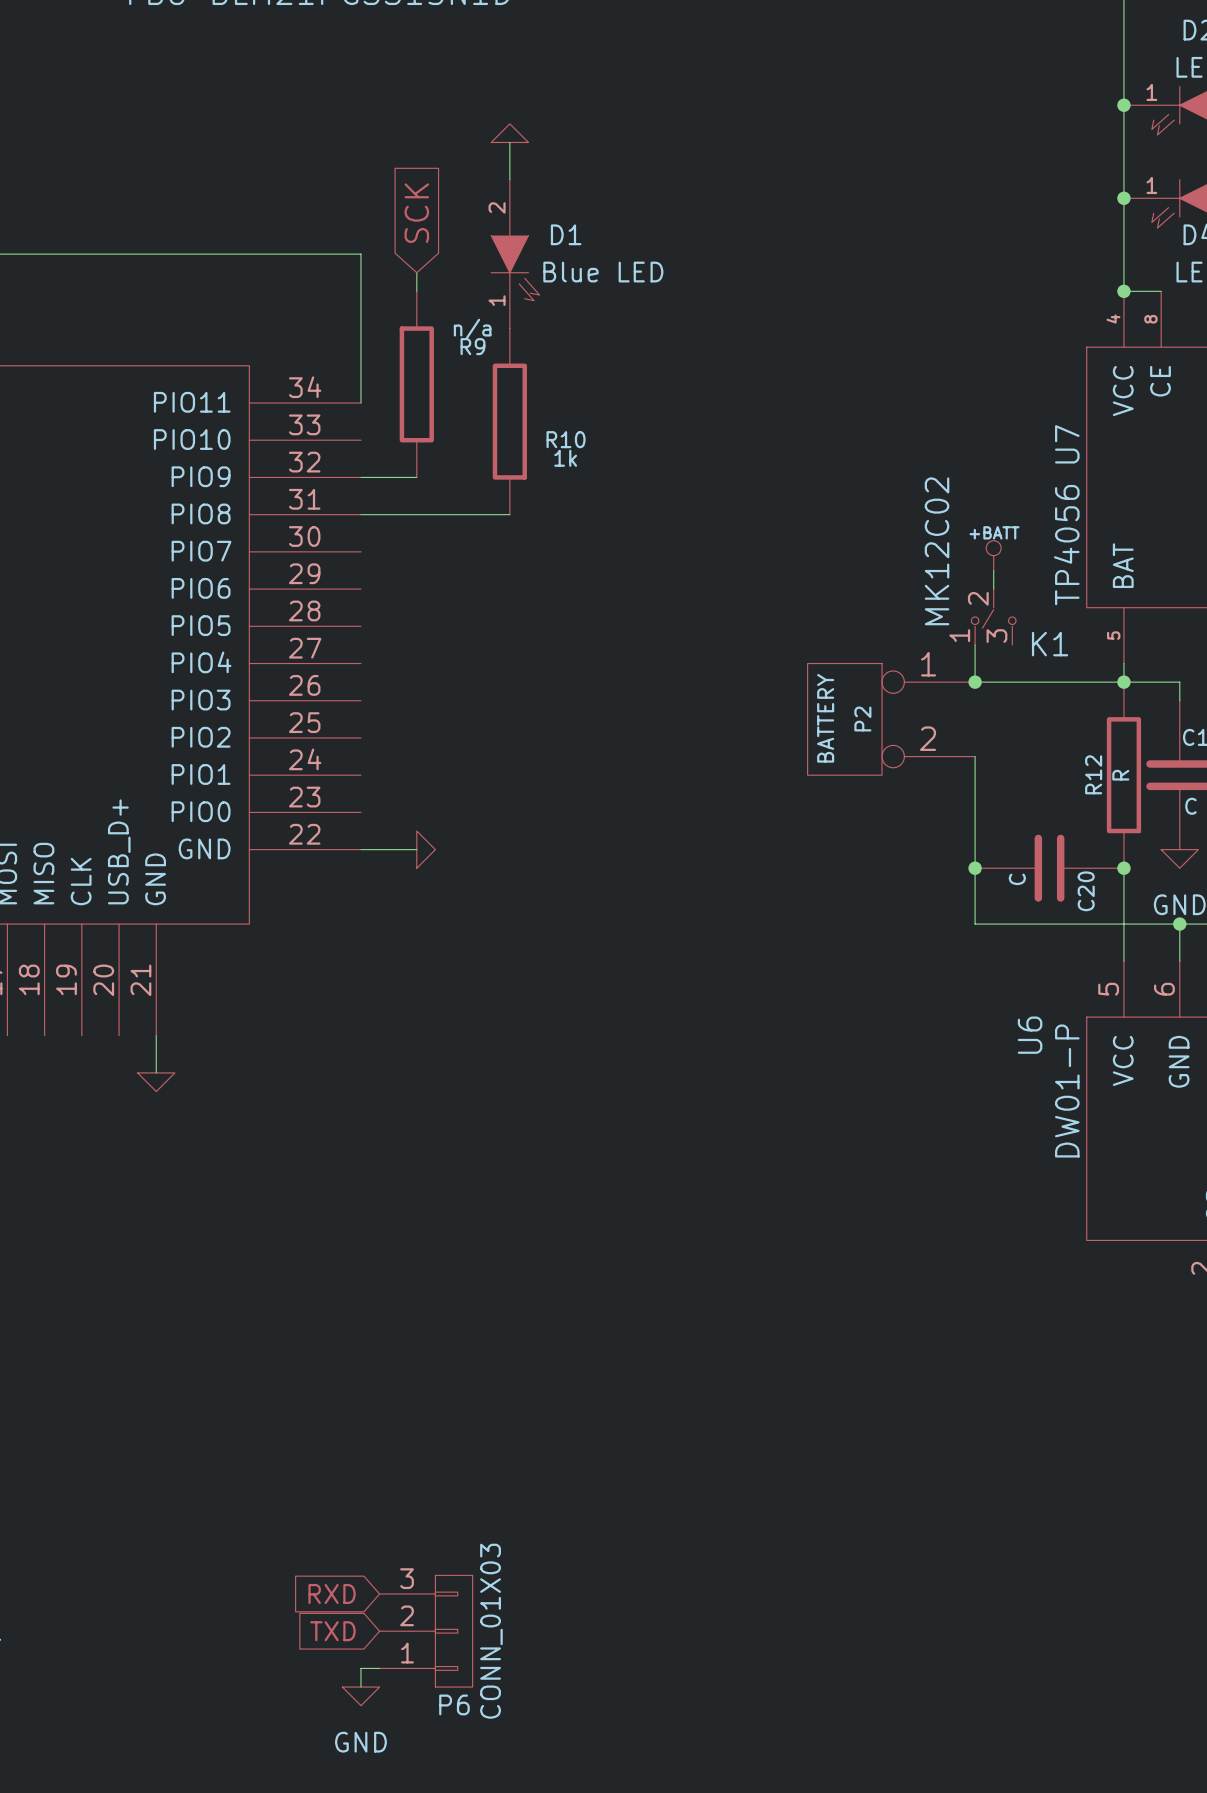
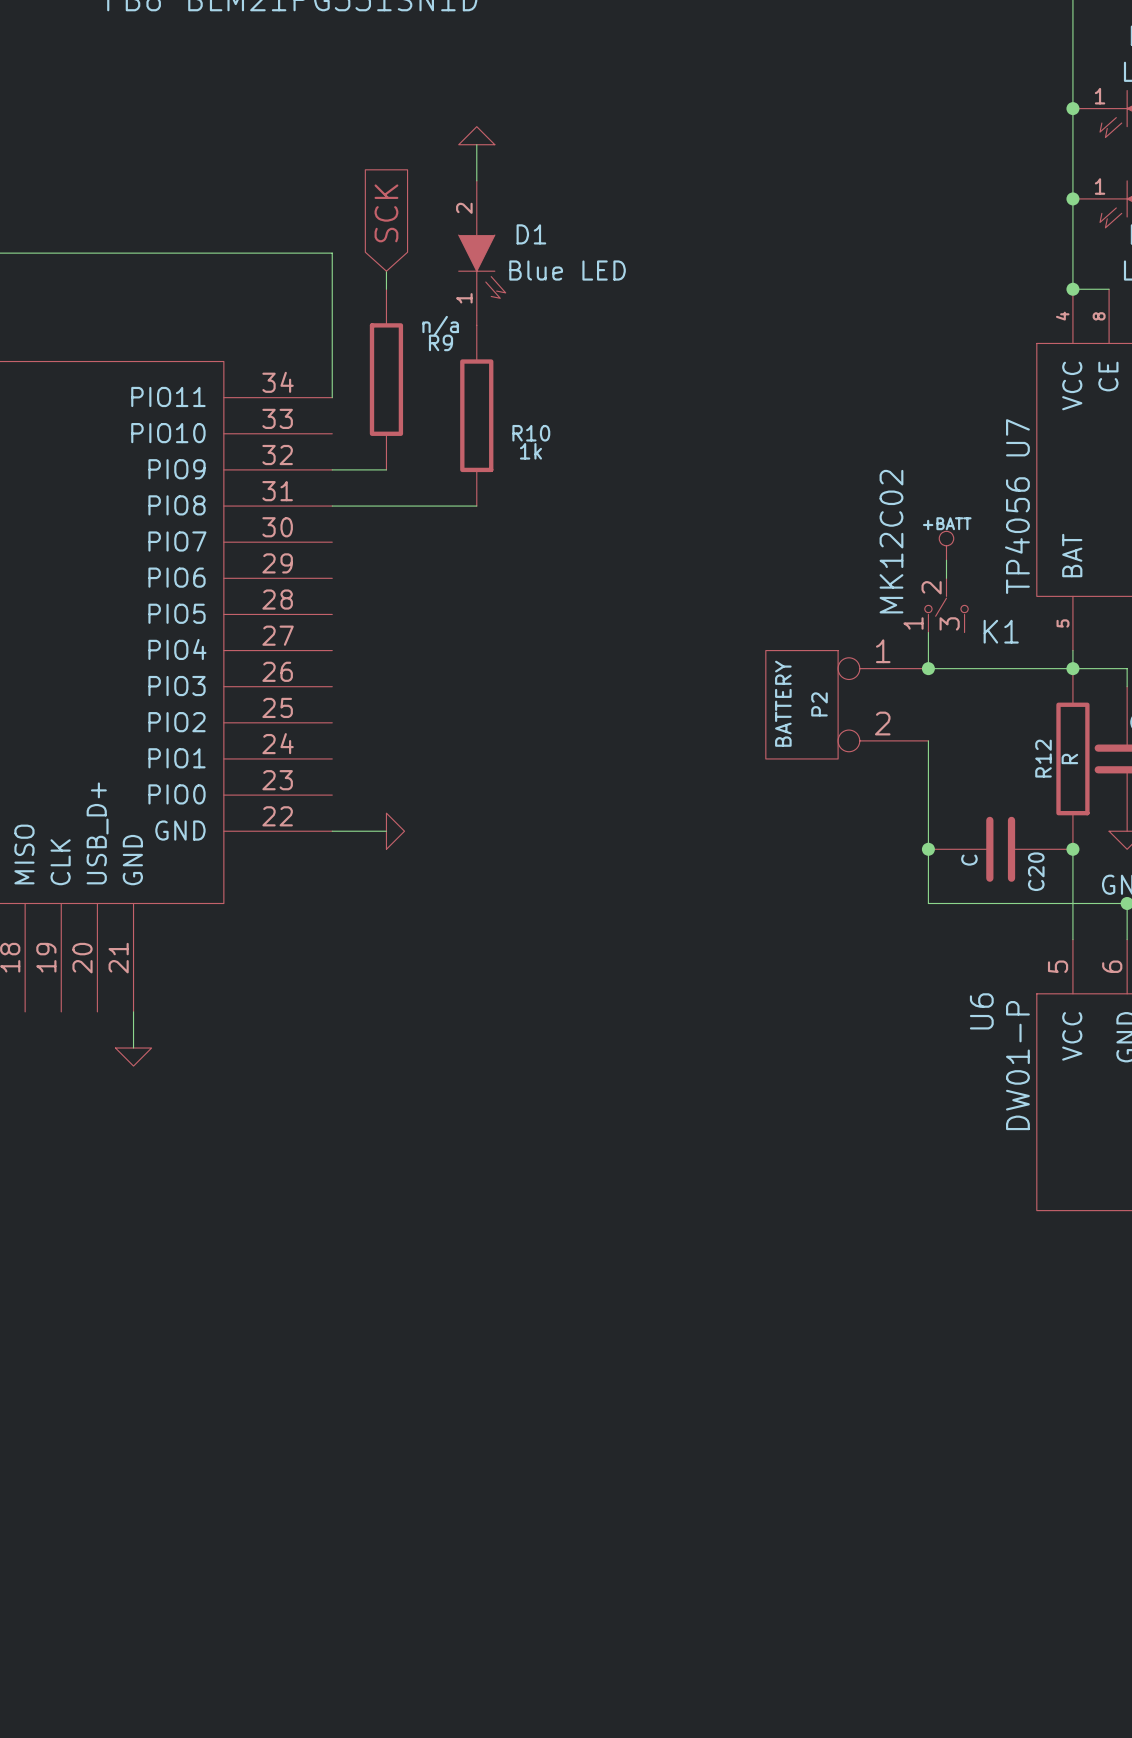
global label: RXD (332, 1593) -> none
global label: TXD (332, 1631) -> none
P6: CONN_01X03 (426, 1631) -> none
wire: (379, 1668) (360, 1668) (360, 1687) -> none
power symbol: GND (360, 1696) -> none

